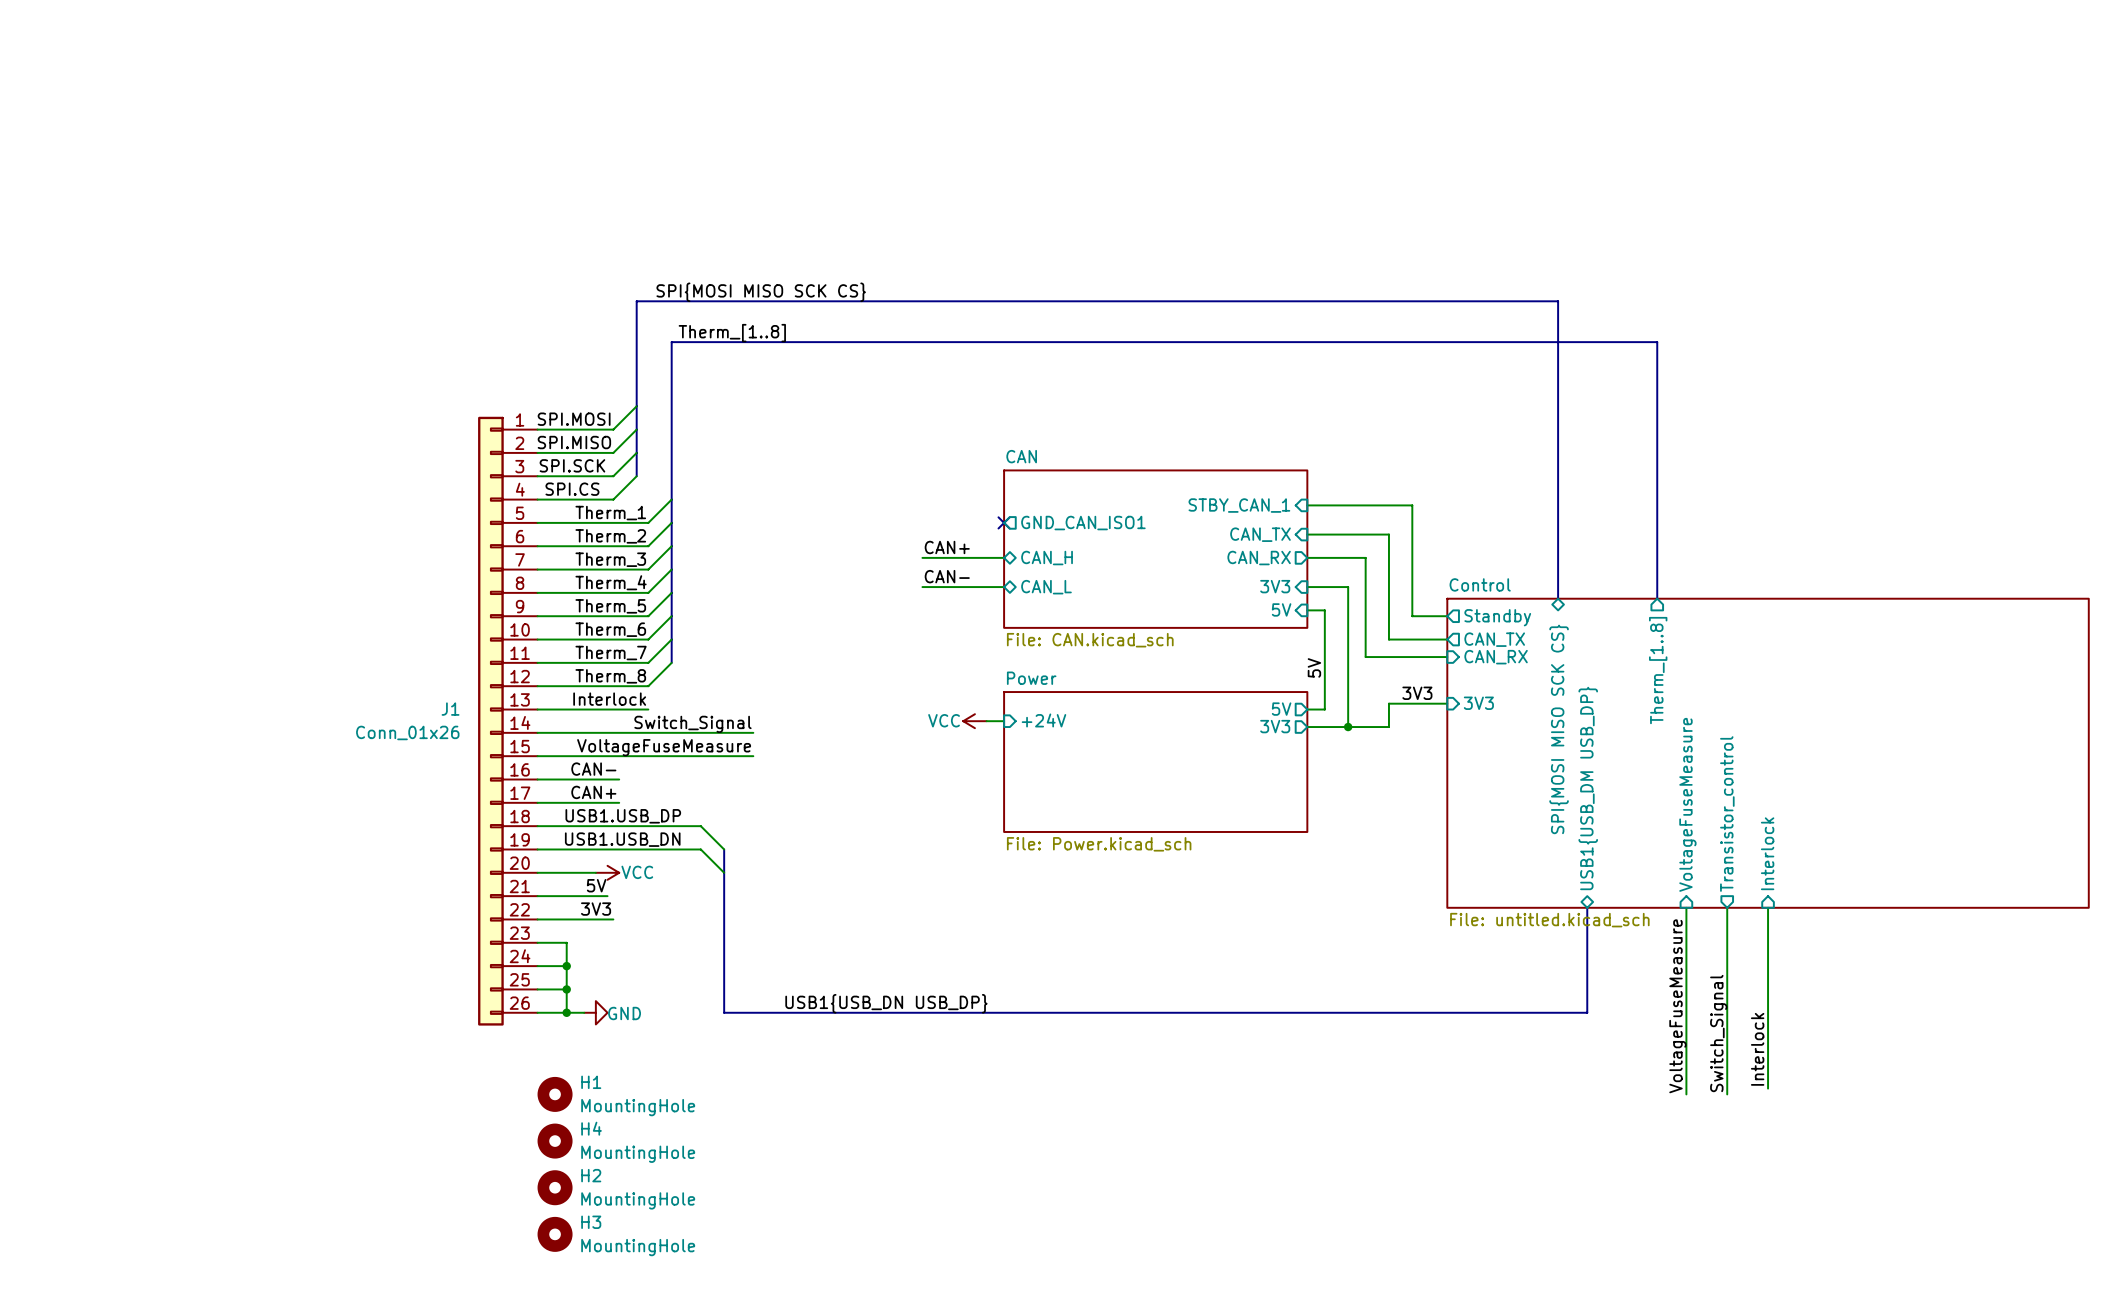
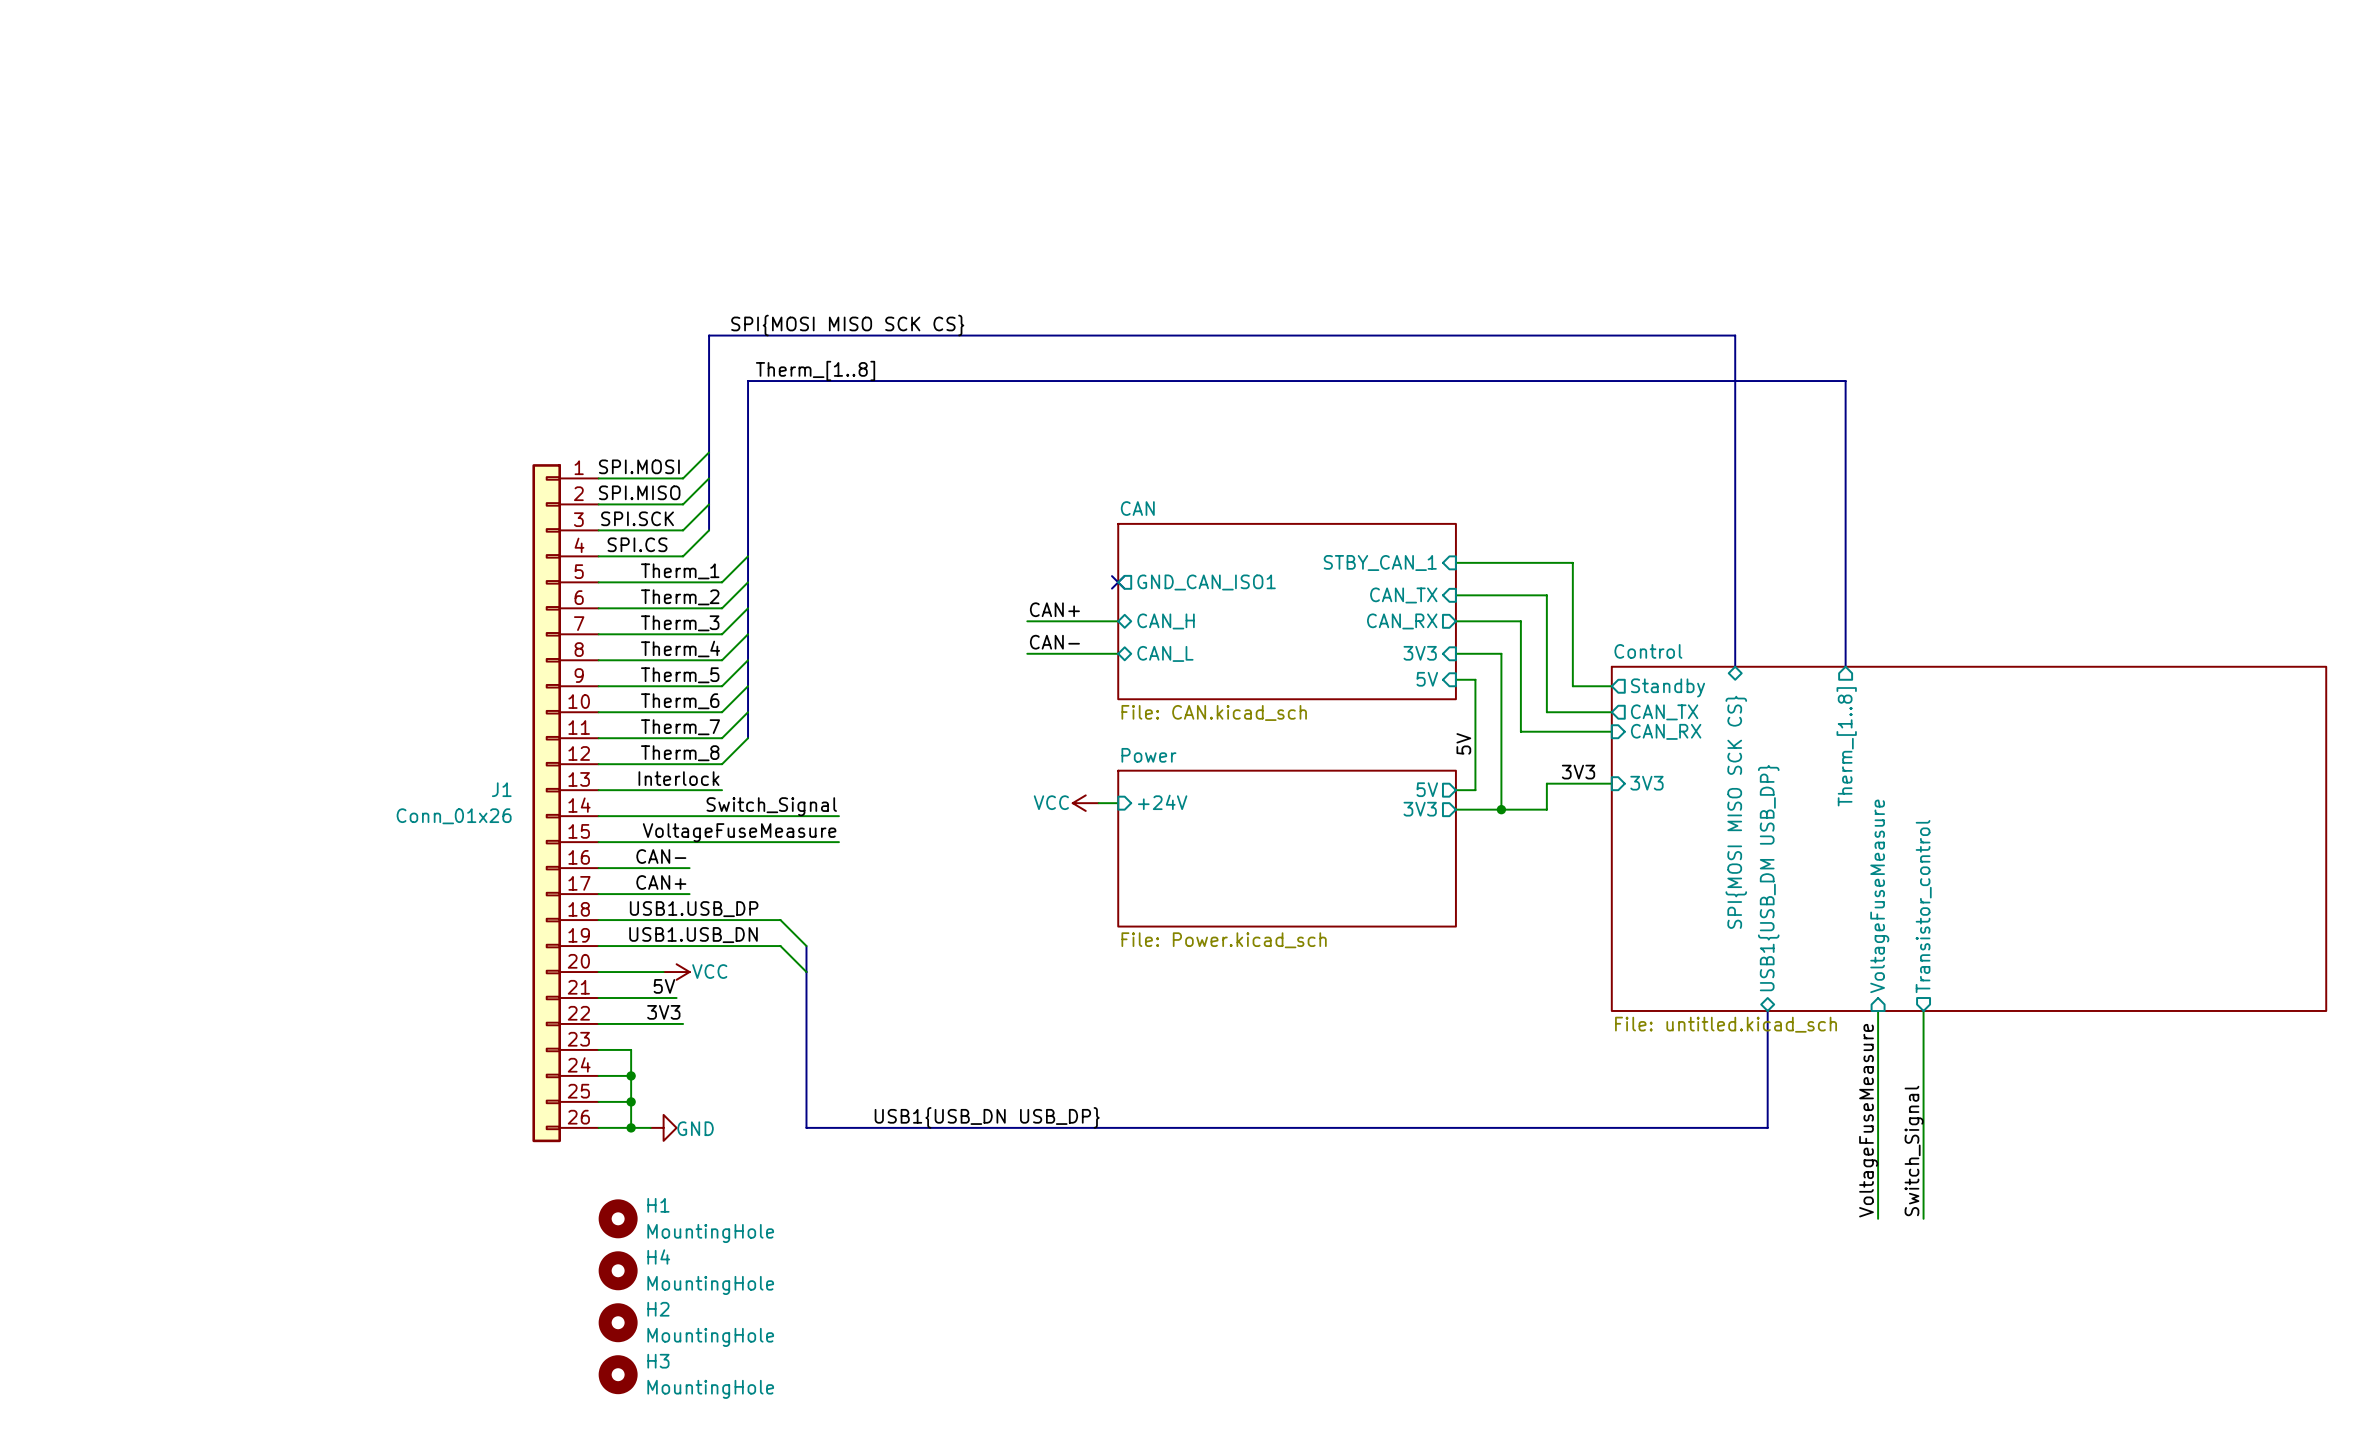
sheet pin: Interlock (1767, 853) -> none
wire: (1768, 907) (1768, 1088) -> none
label: Interlock (1757, 1049) -> none

